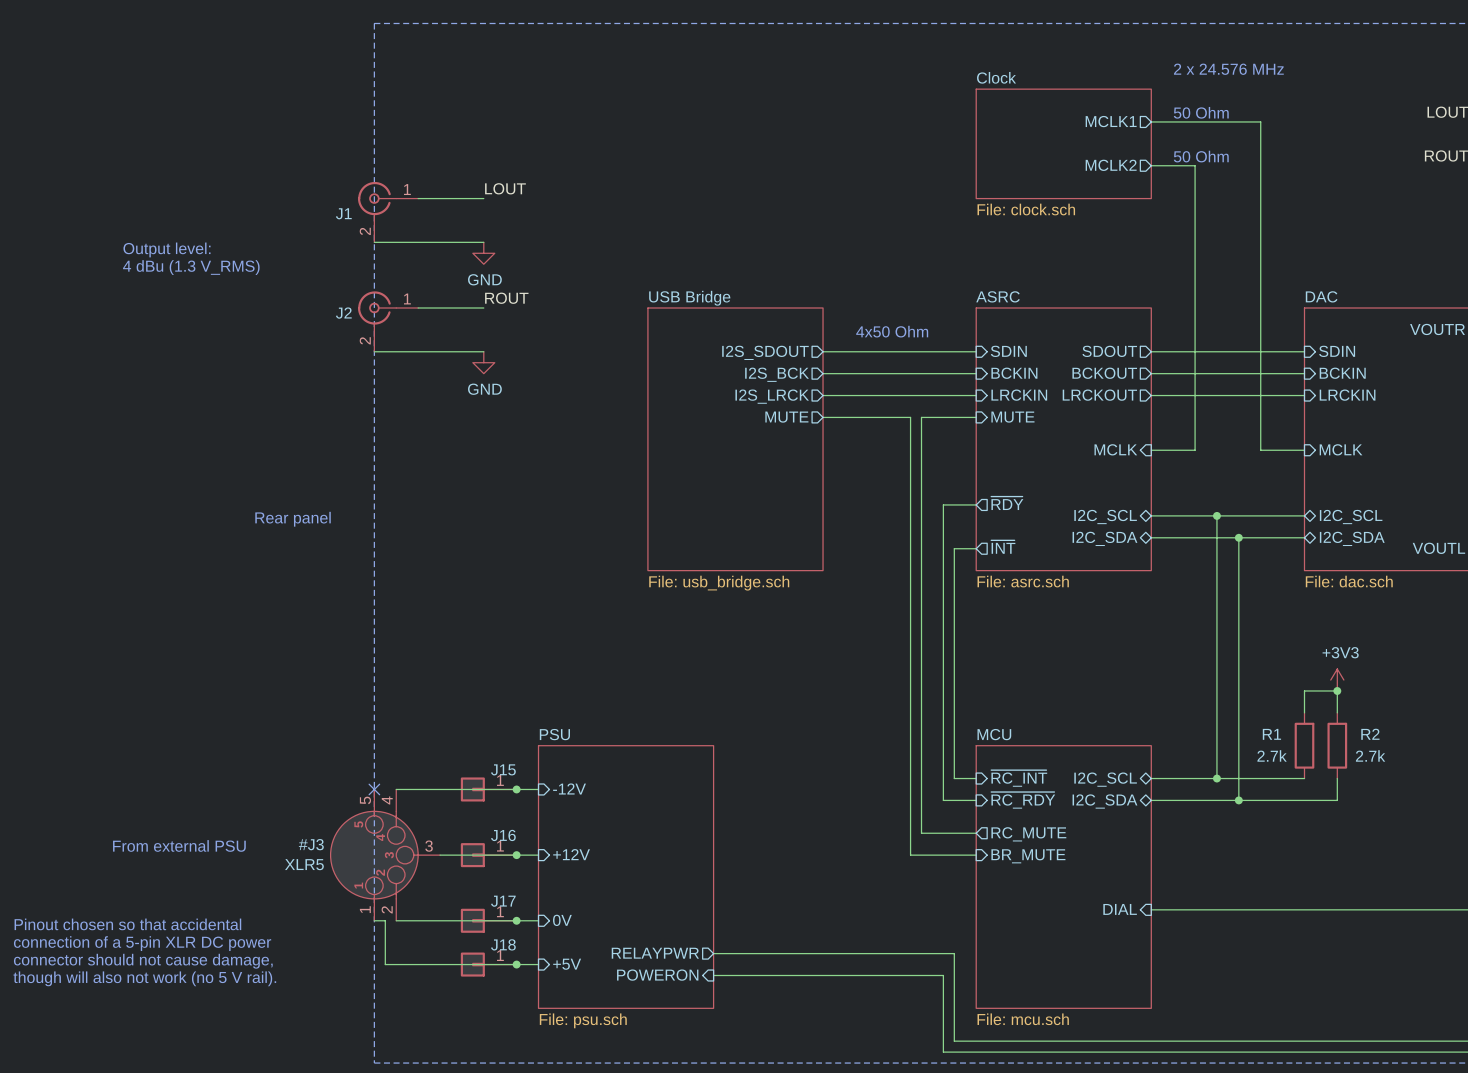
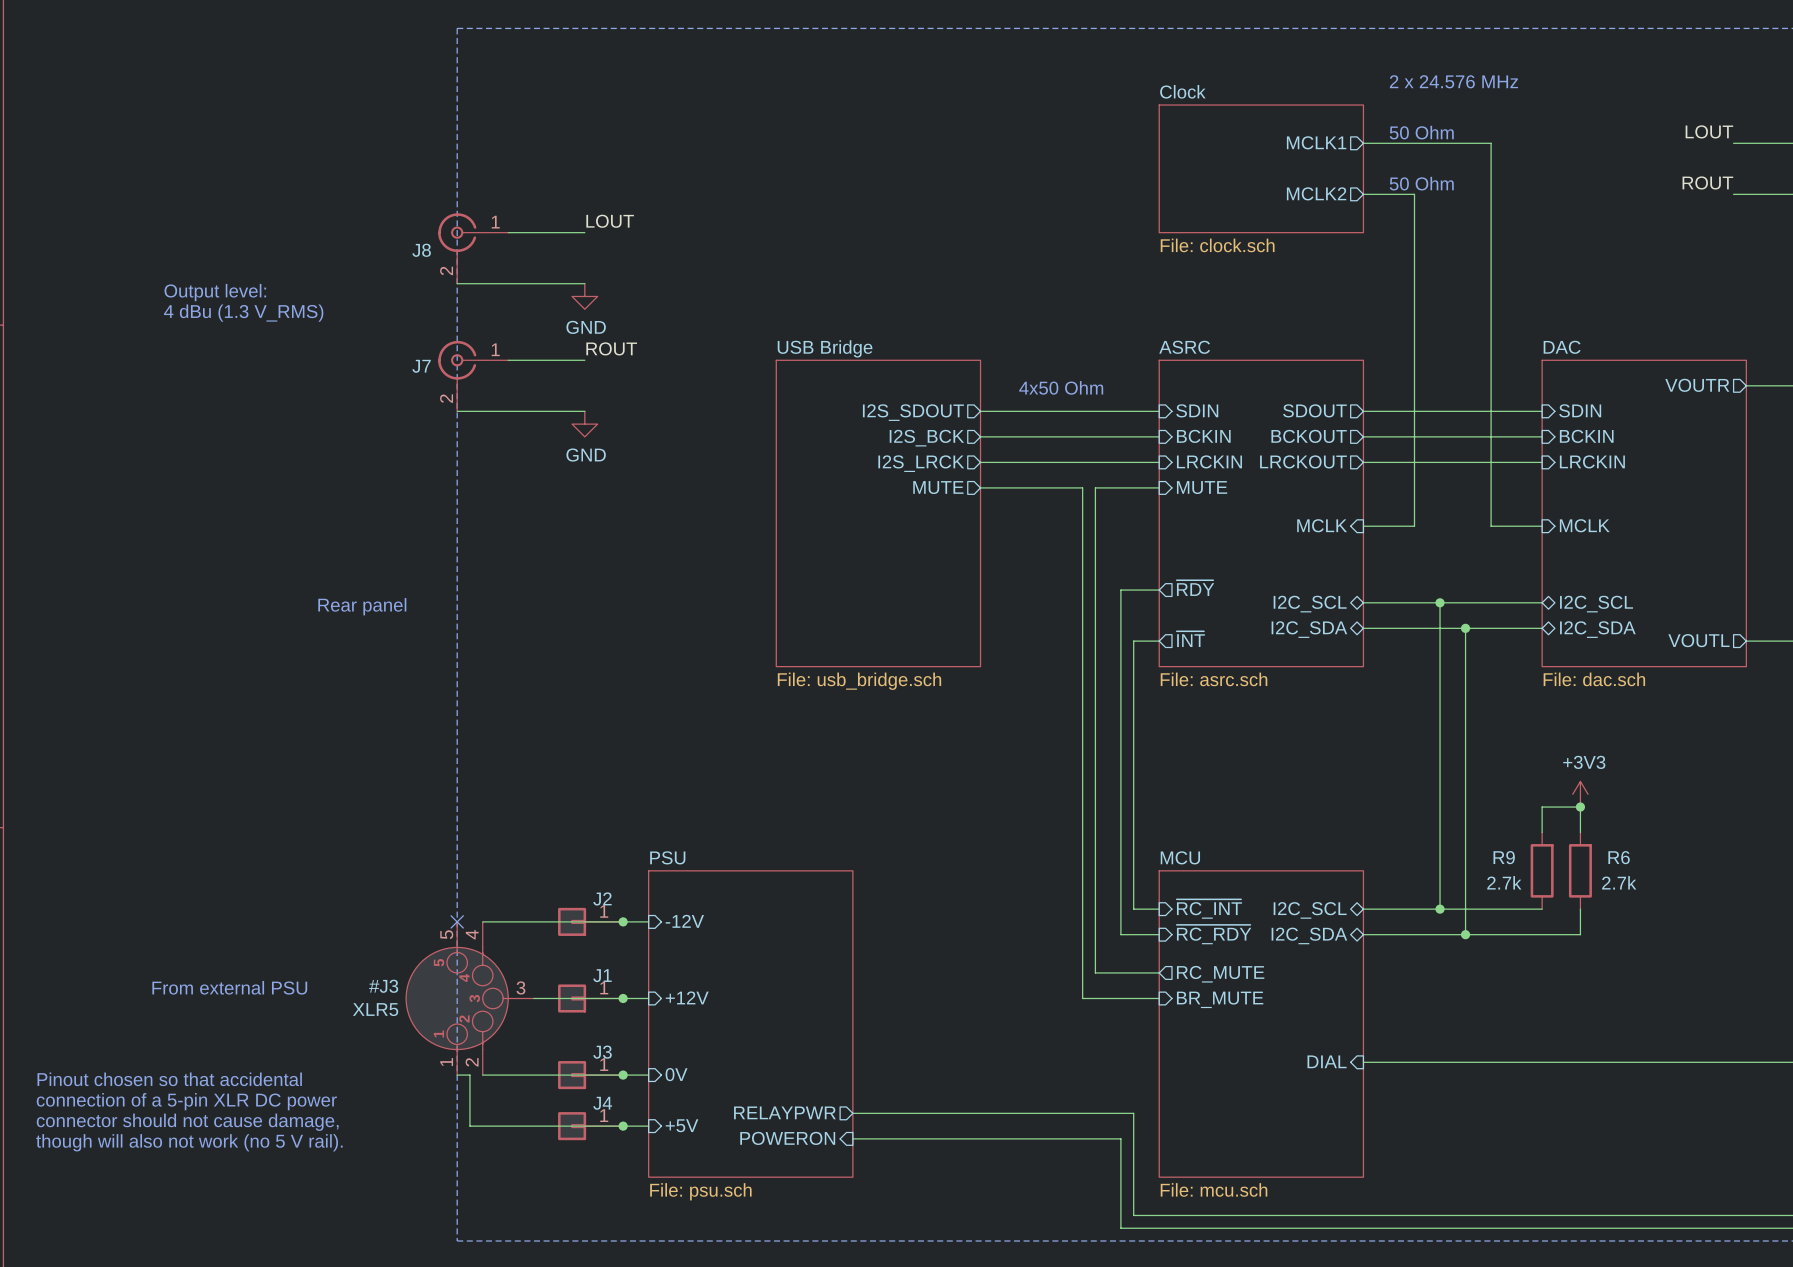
J1 name: J1 (343, 213) -> J8 (421, 250)
J2 name: J2 (343, 313) -> J7 (421, 366)
R1 name: R1 (1271, 734) -> R9 (1504, 857)
R2 name: R2 (1370, 734) -> R6 (1619, 857)
J15 name: J15 (503, 769) -> J2 (602, 898)
J16 name: J16 (503, 835) -> J1 (602, 975)
J17 name: J17 (503, 901) -> J3 (602, 1052)
J18 name: J18 (503, 944) -> J4 (602, 1103)

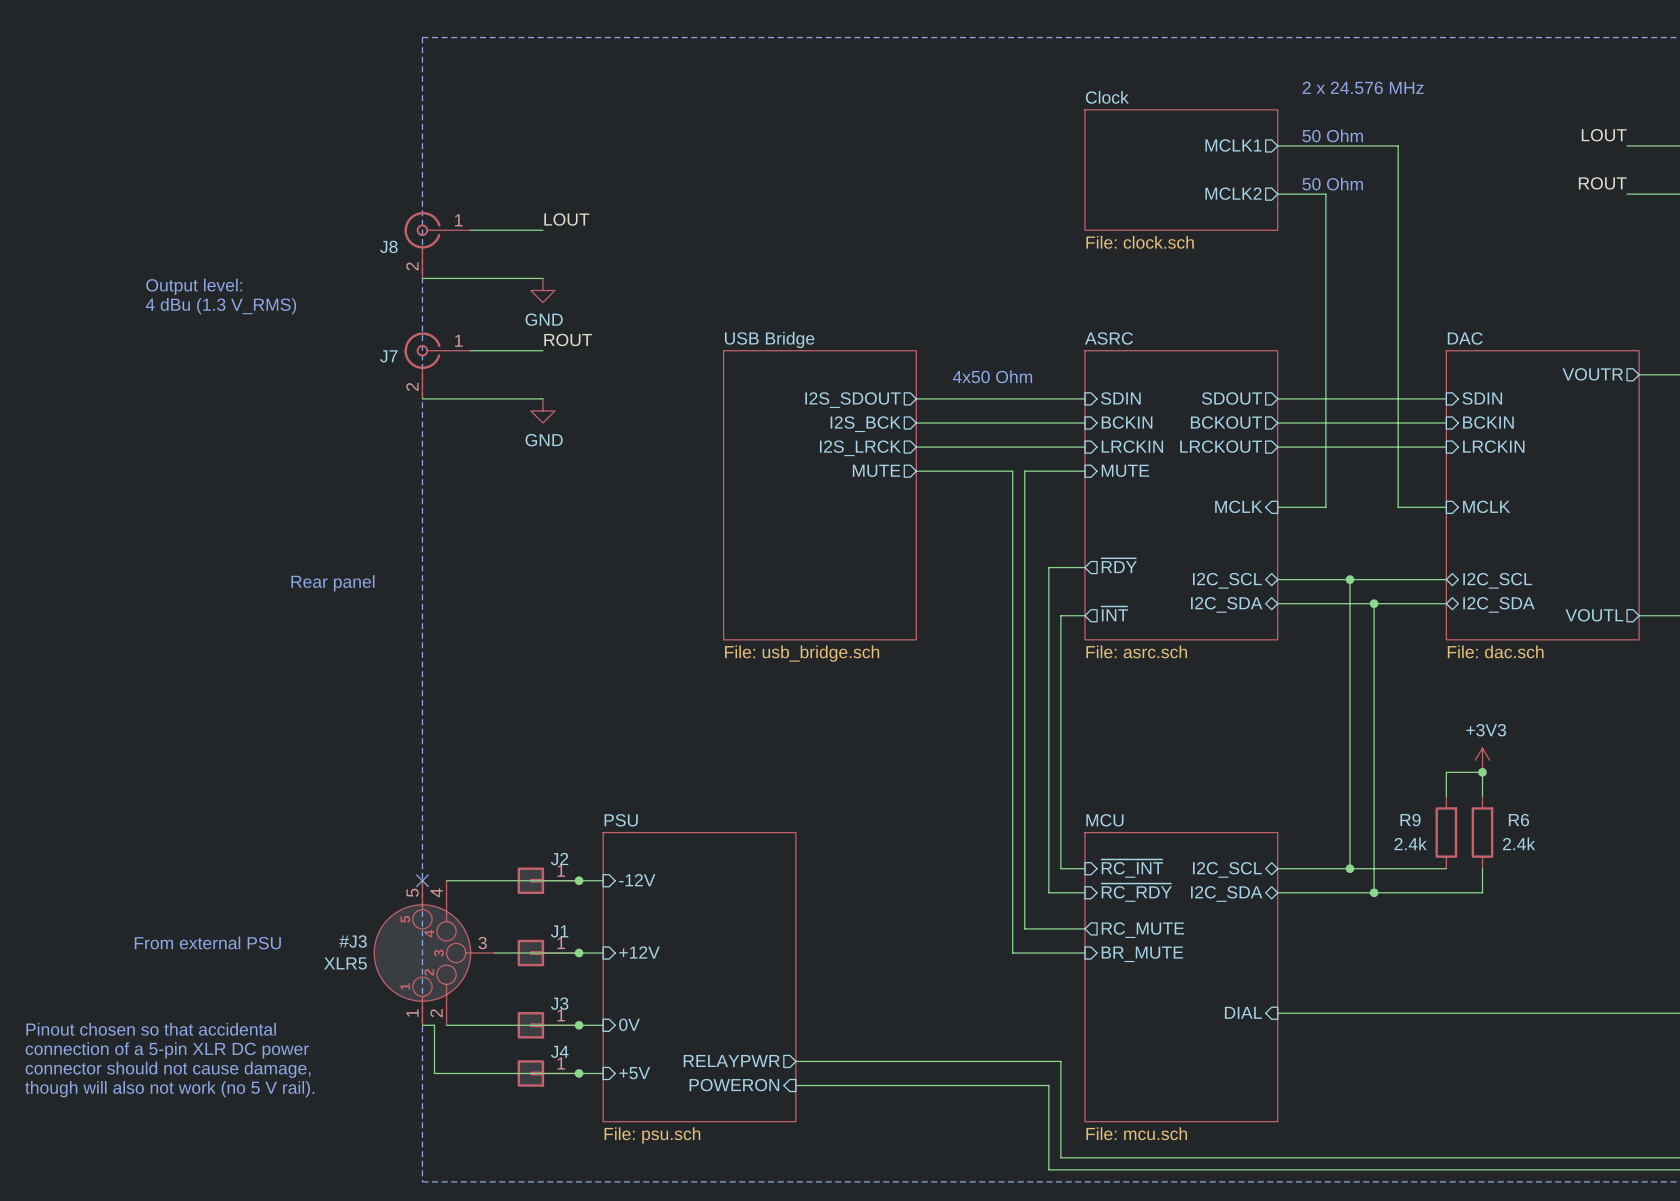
R9 value: 2.7k (1504, 882) -> 2.4k (1410, 843)
R6 value: 2.7k (1619, 882) -> 2.4k (1519, 843)

